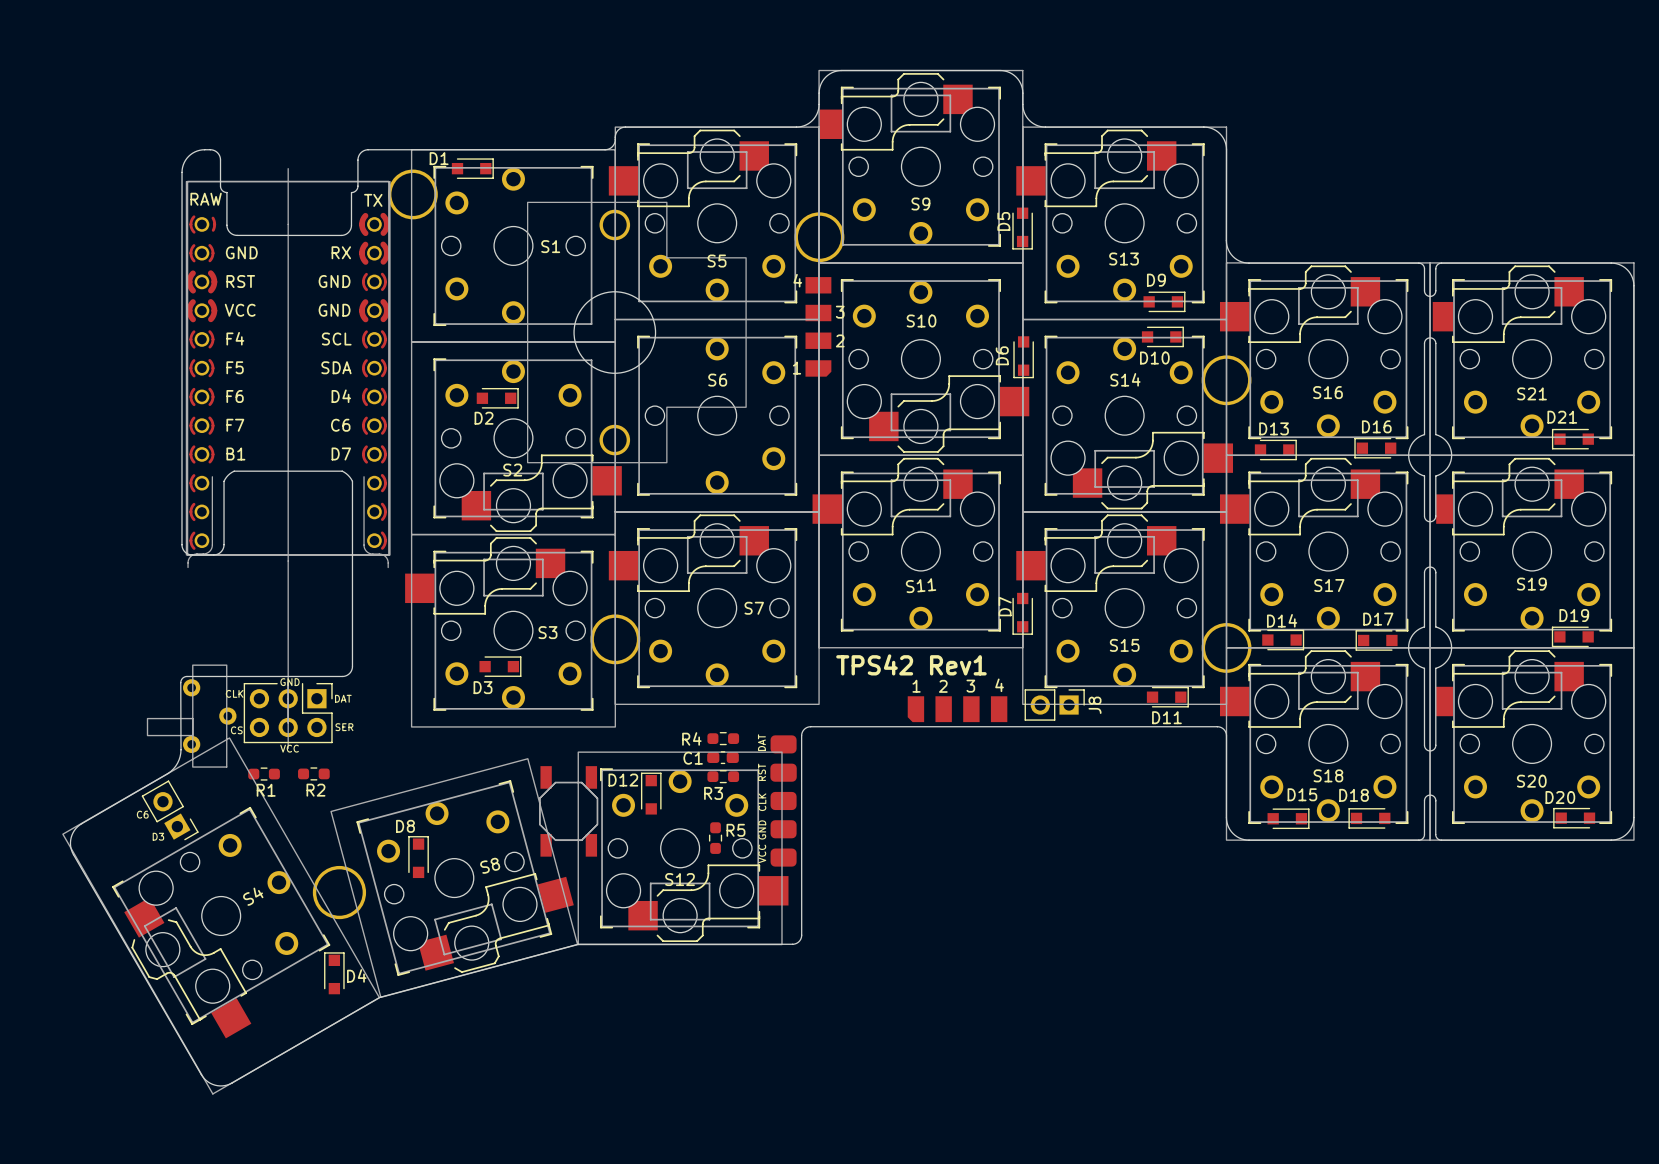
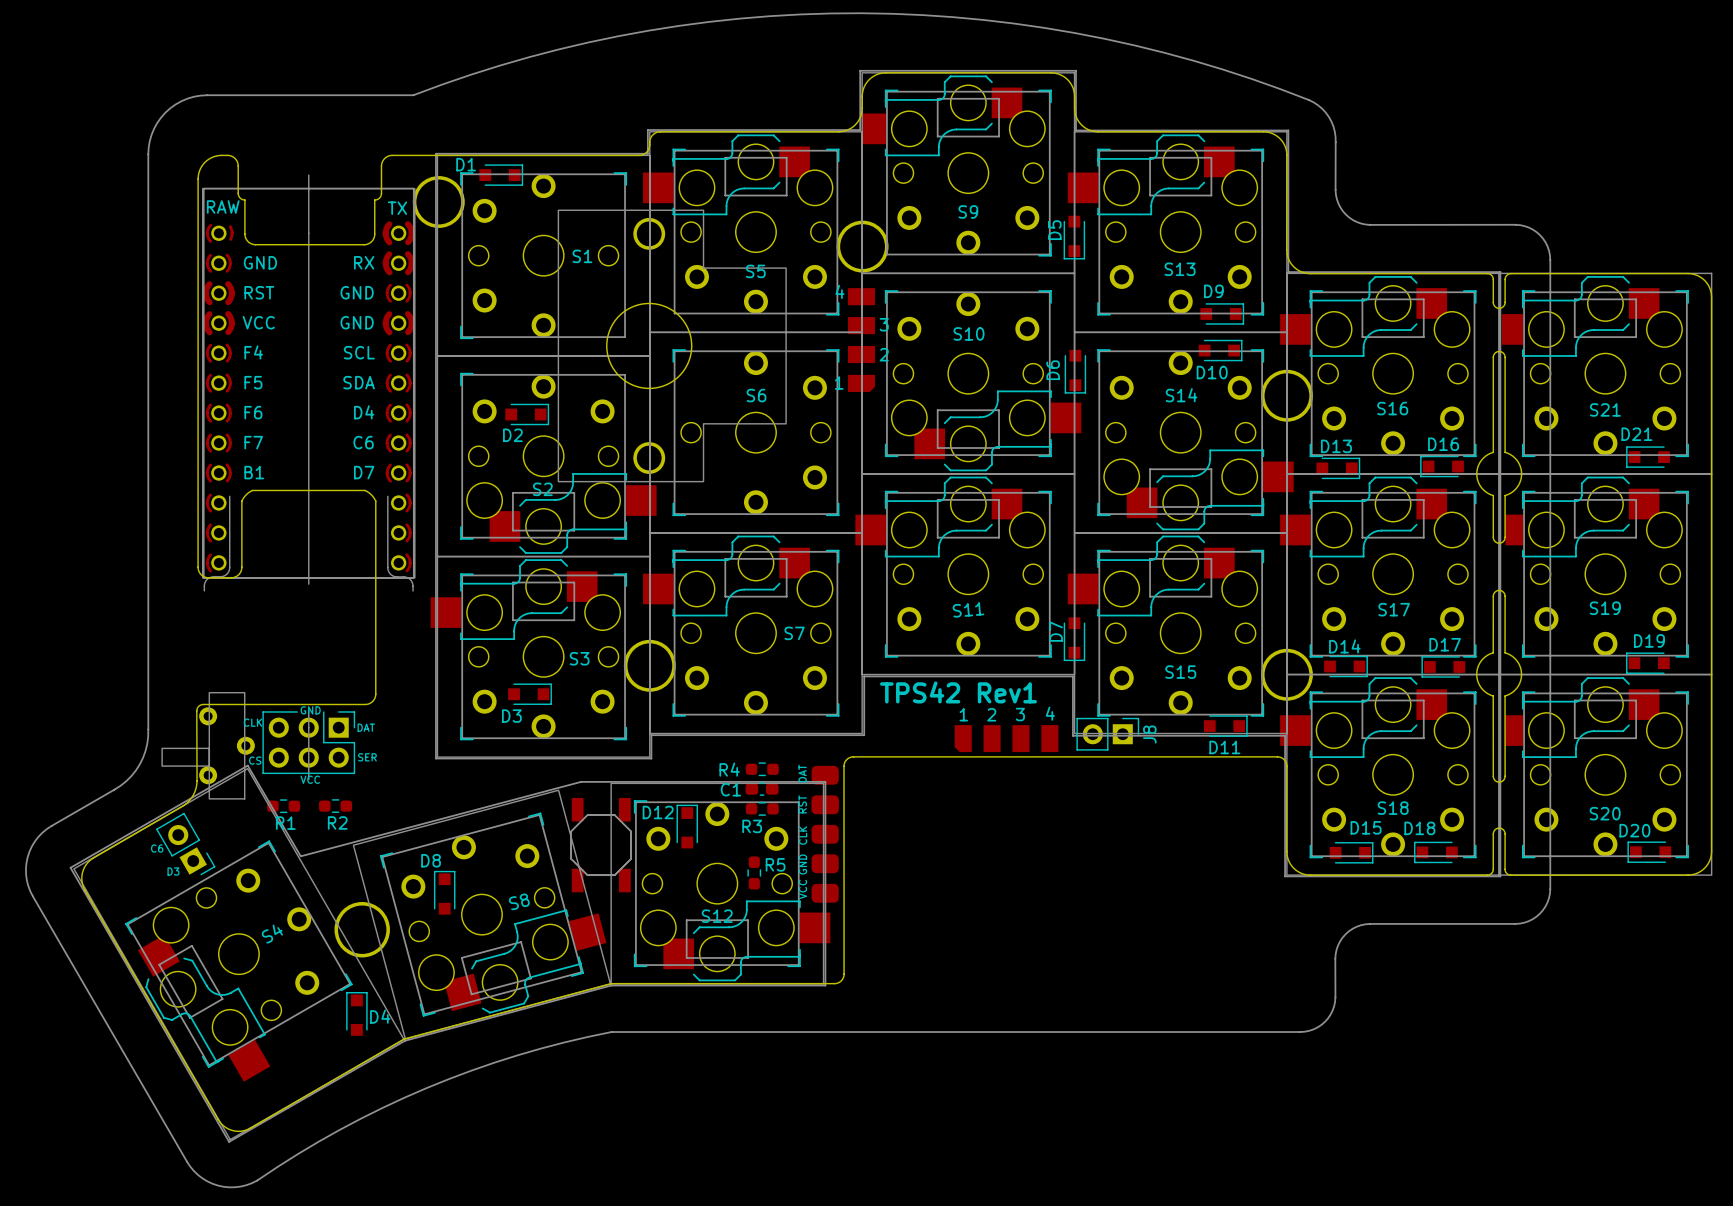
line: none -> (860, 70) (860, 130) (647, 130) (647, 153) (435, 153) (435, 758) (651, 758) (651, 735) (864, 735) (864, 676) (1072, 676) (1072, 735) (1285, 735) (1285, 876) (1500, 876) (1500, 272) (1288, 272) (1288, 130) (1076, 130) (1076, 70) (860, 70)
line: none -> (207, 95) (413, 95) (470, 74) (559, 49) (648, 30) (739, 18) (800, 14) (861, 13) (922, 15) (983, 19) (1074, 32) (1163, 52) (1251, 78) (1313, 102) (1328, 116) (1334, 131) (1335, 189) (1338, 203) (1345, 214) (1356, 222) (1370, 224) (1515, 224) (1532, 229) (1545, 242) (1550, 259) (1550, 889) (1545, 906) (1532, 919) (1519, 923) (1370, 923) (1352, 928) (1342, 937) (1336, 949) (1335, 997) (1332, 1010) (1324, 1021) (1309, 1030) (611, 1032) (517, 1055) (426, 1088) (339, 1129) (246, 1185) (223, 1186) (202, 1178) (187, 1161) (32, 896) (28, 885) (25, 868) (29, 851) (42, 832) (126, 781) (139, 764) (147, 743) (148, 147) (154, 128) (170, 108) (187, 98) (207, 95)
line: (288, 561) (288, 723) -> none
line: none -> (247, 765) (300, 856) (581, 781) (825, 781) (825, 985) (611, 985) (405, 1040) (229, 1141) (70, 867) (247, 765)

